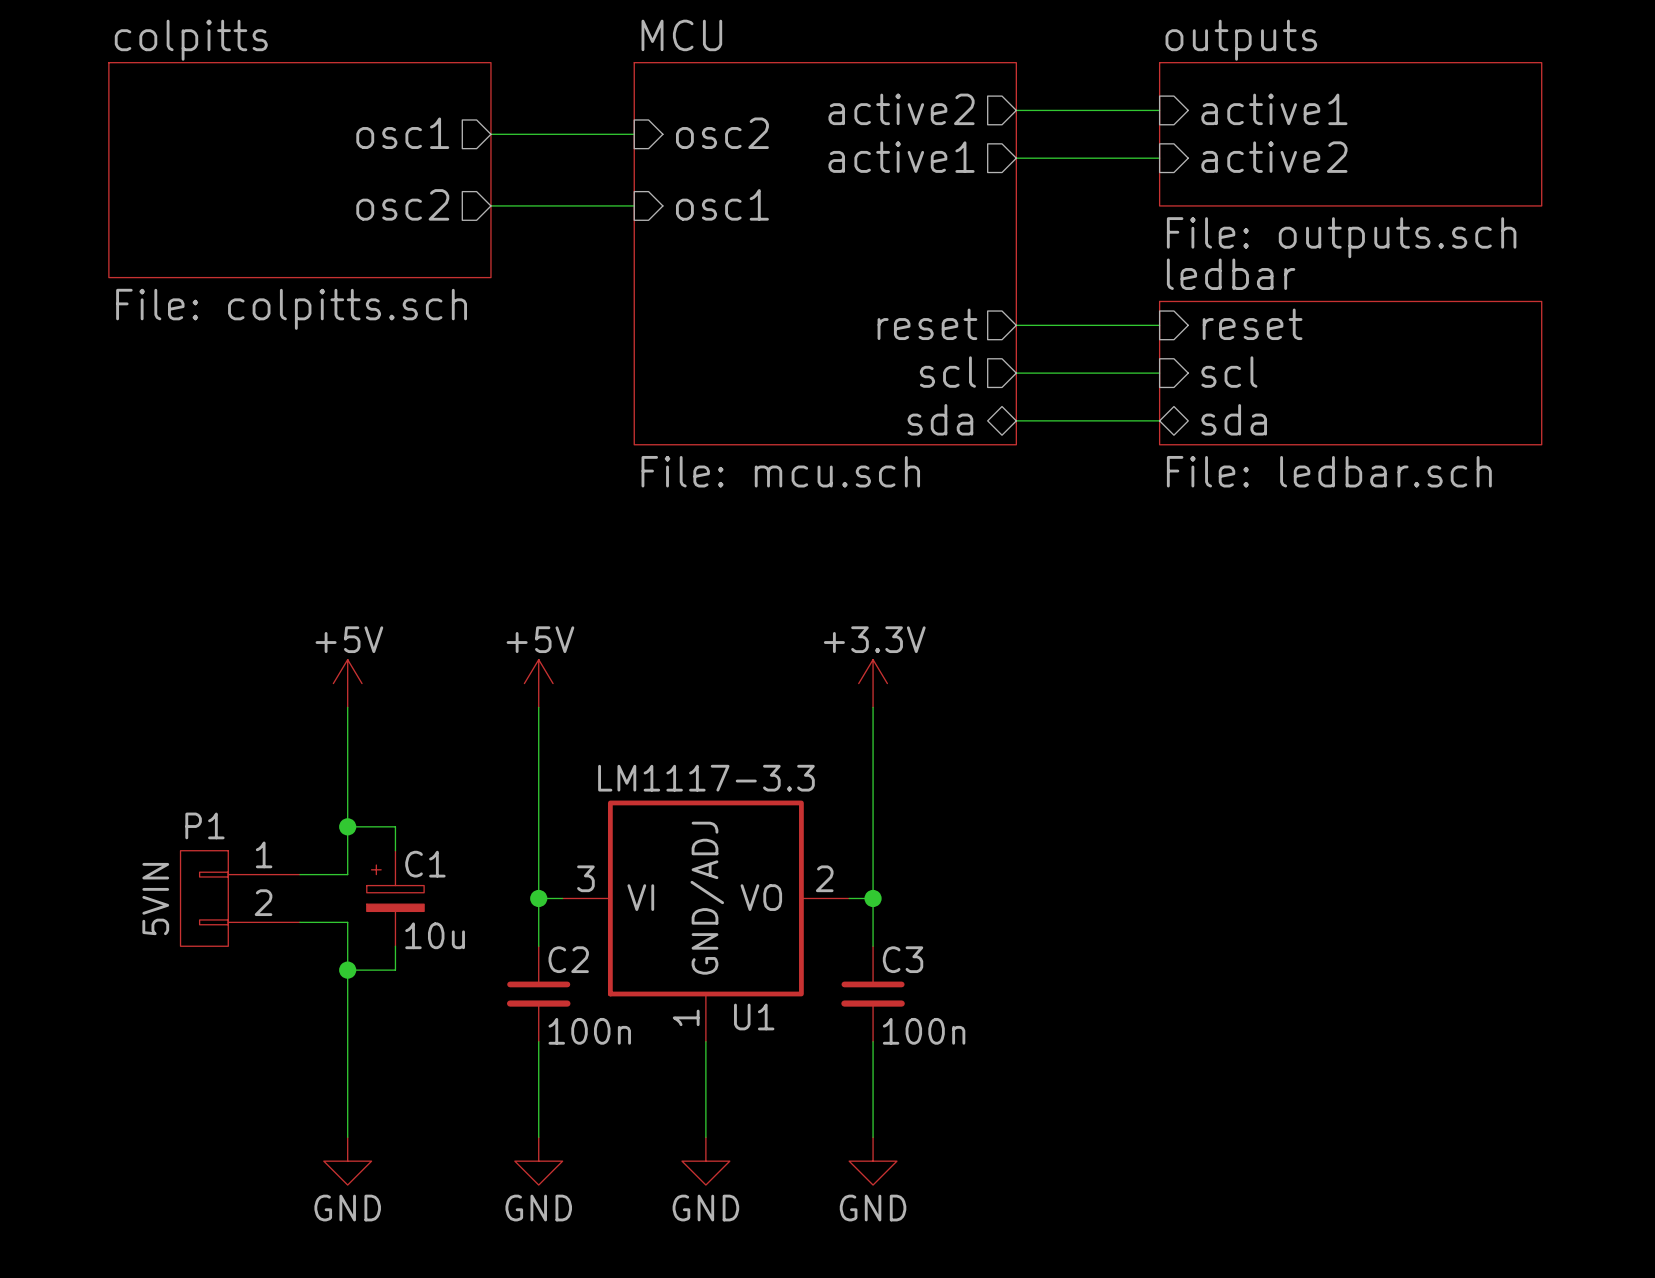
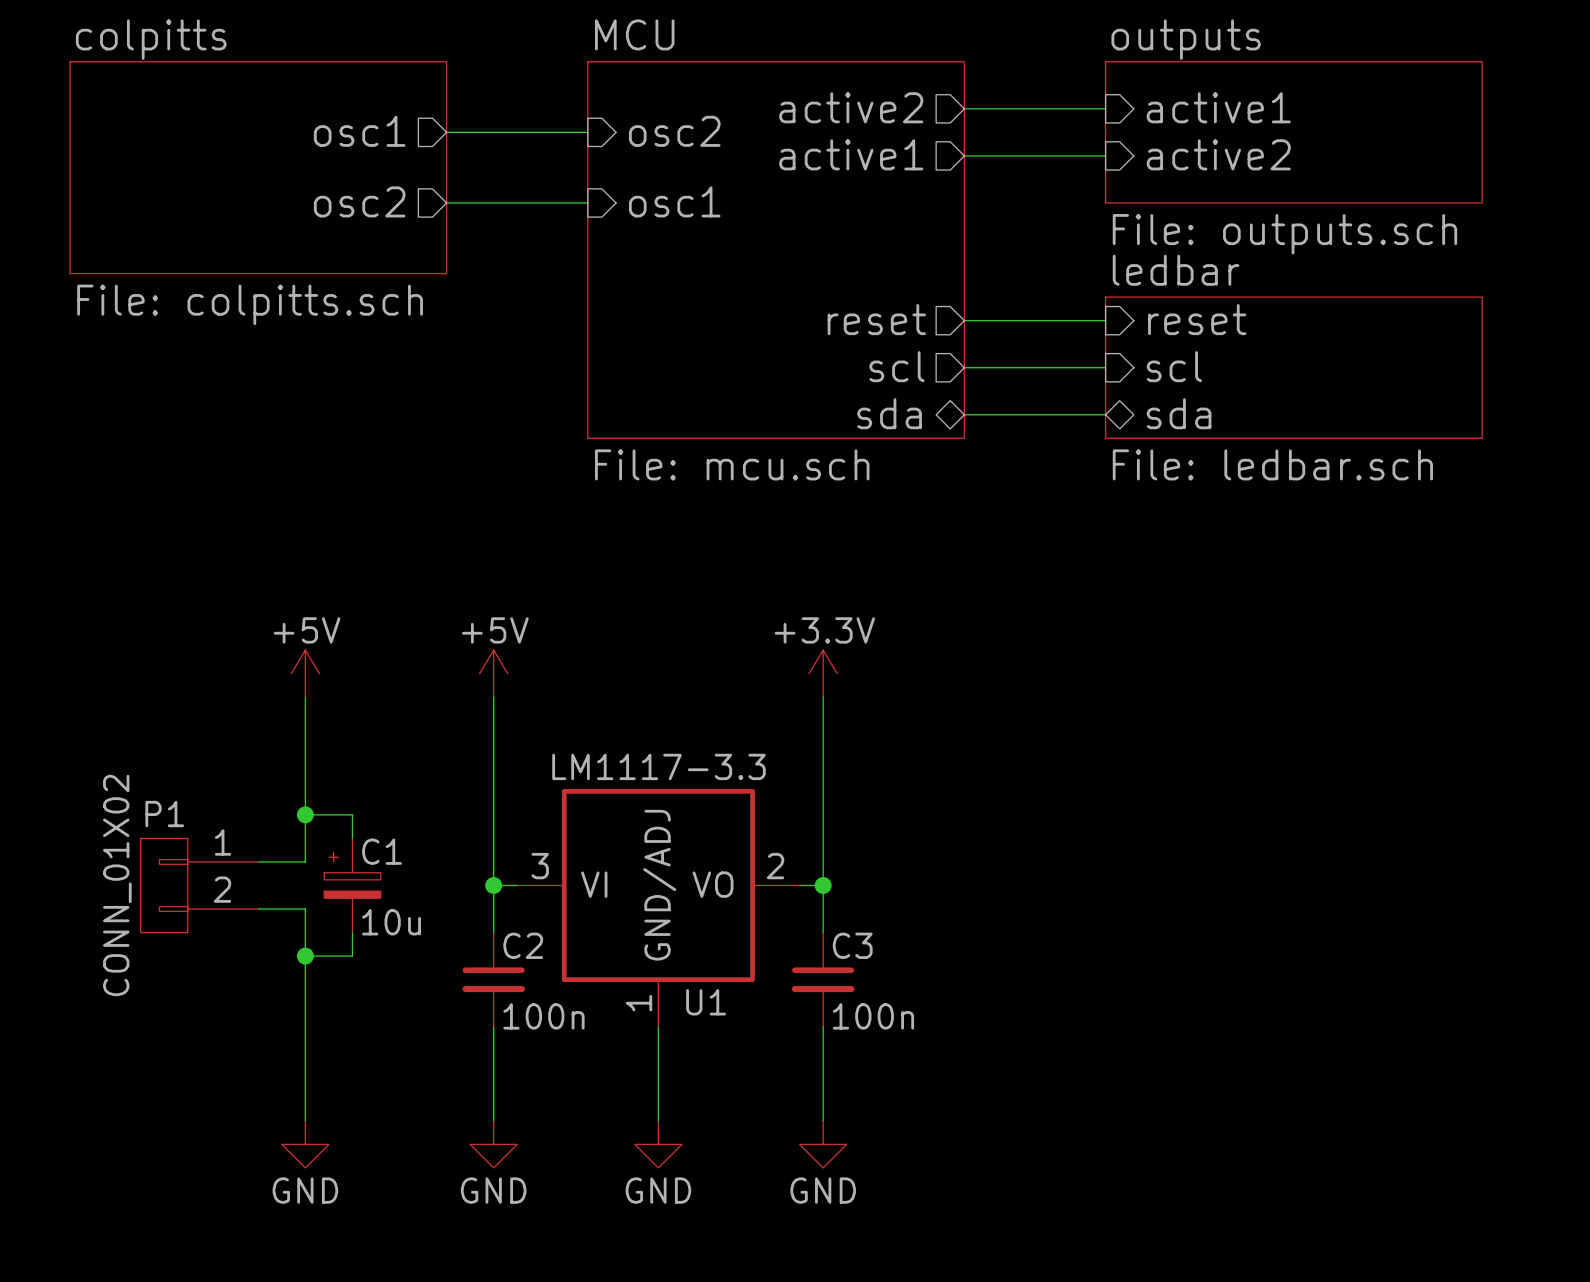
P1 value: 5VIN (155, 899) -> CONN_01X02 (117, 885)

